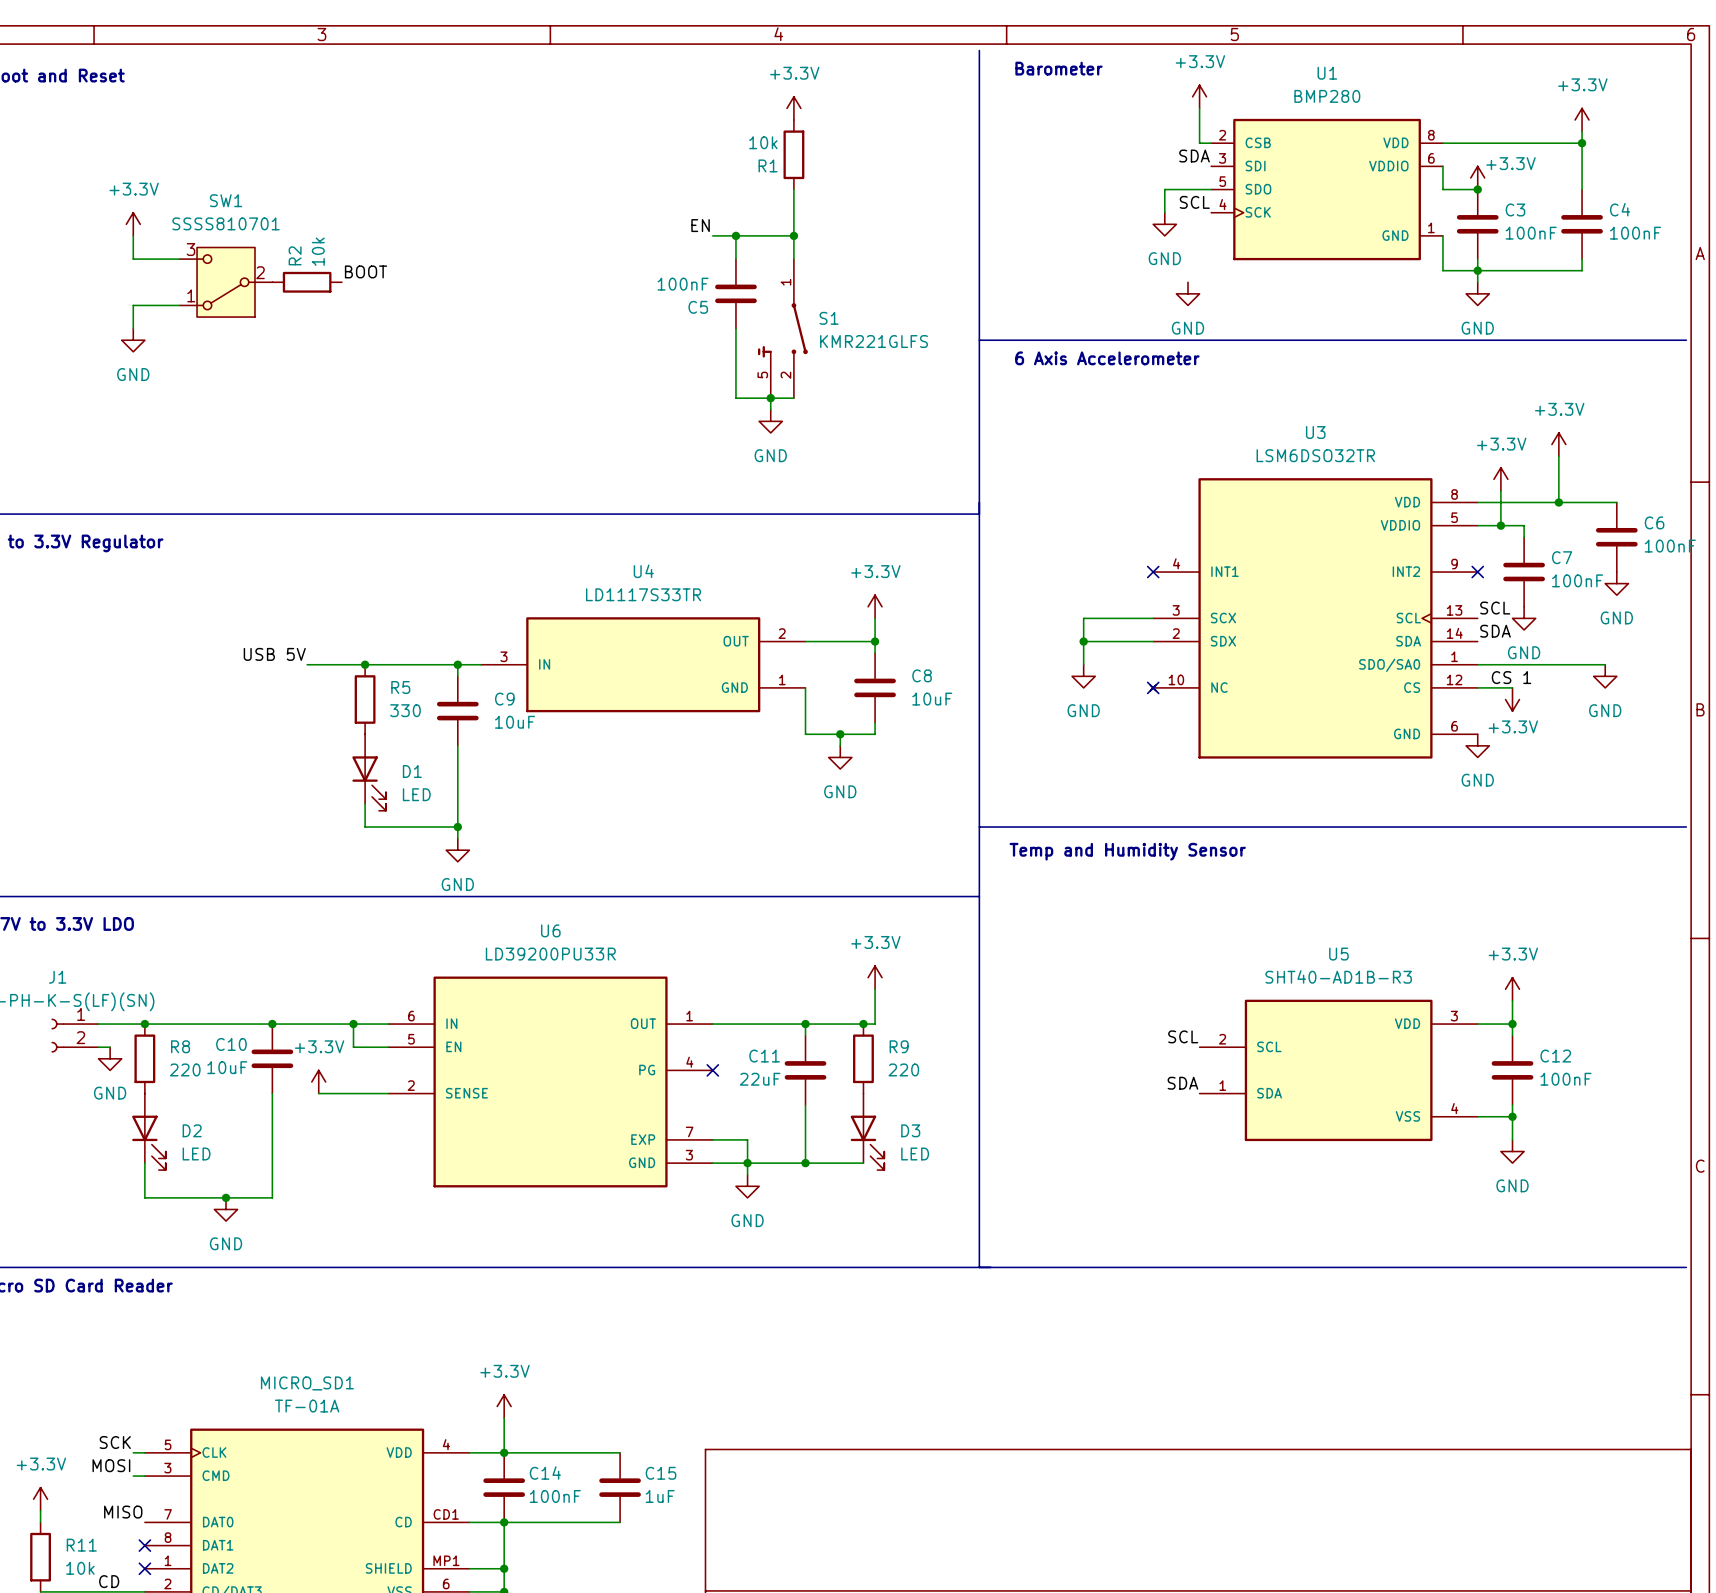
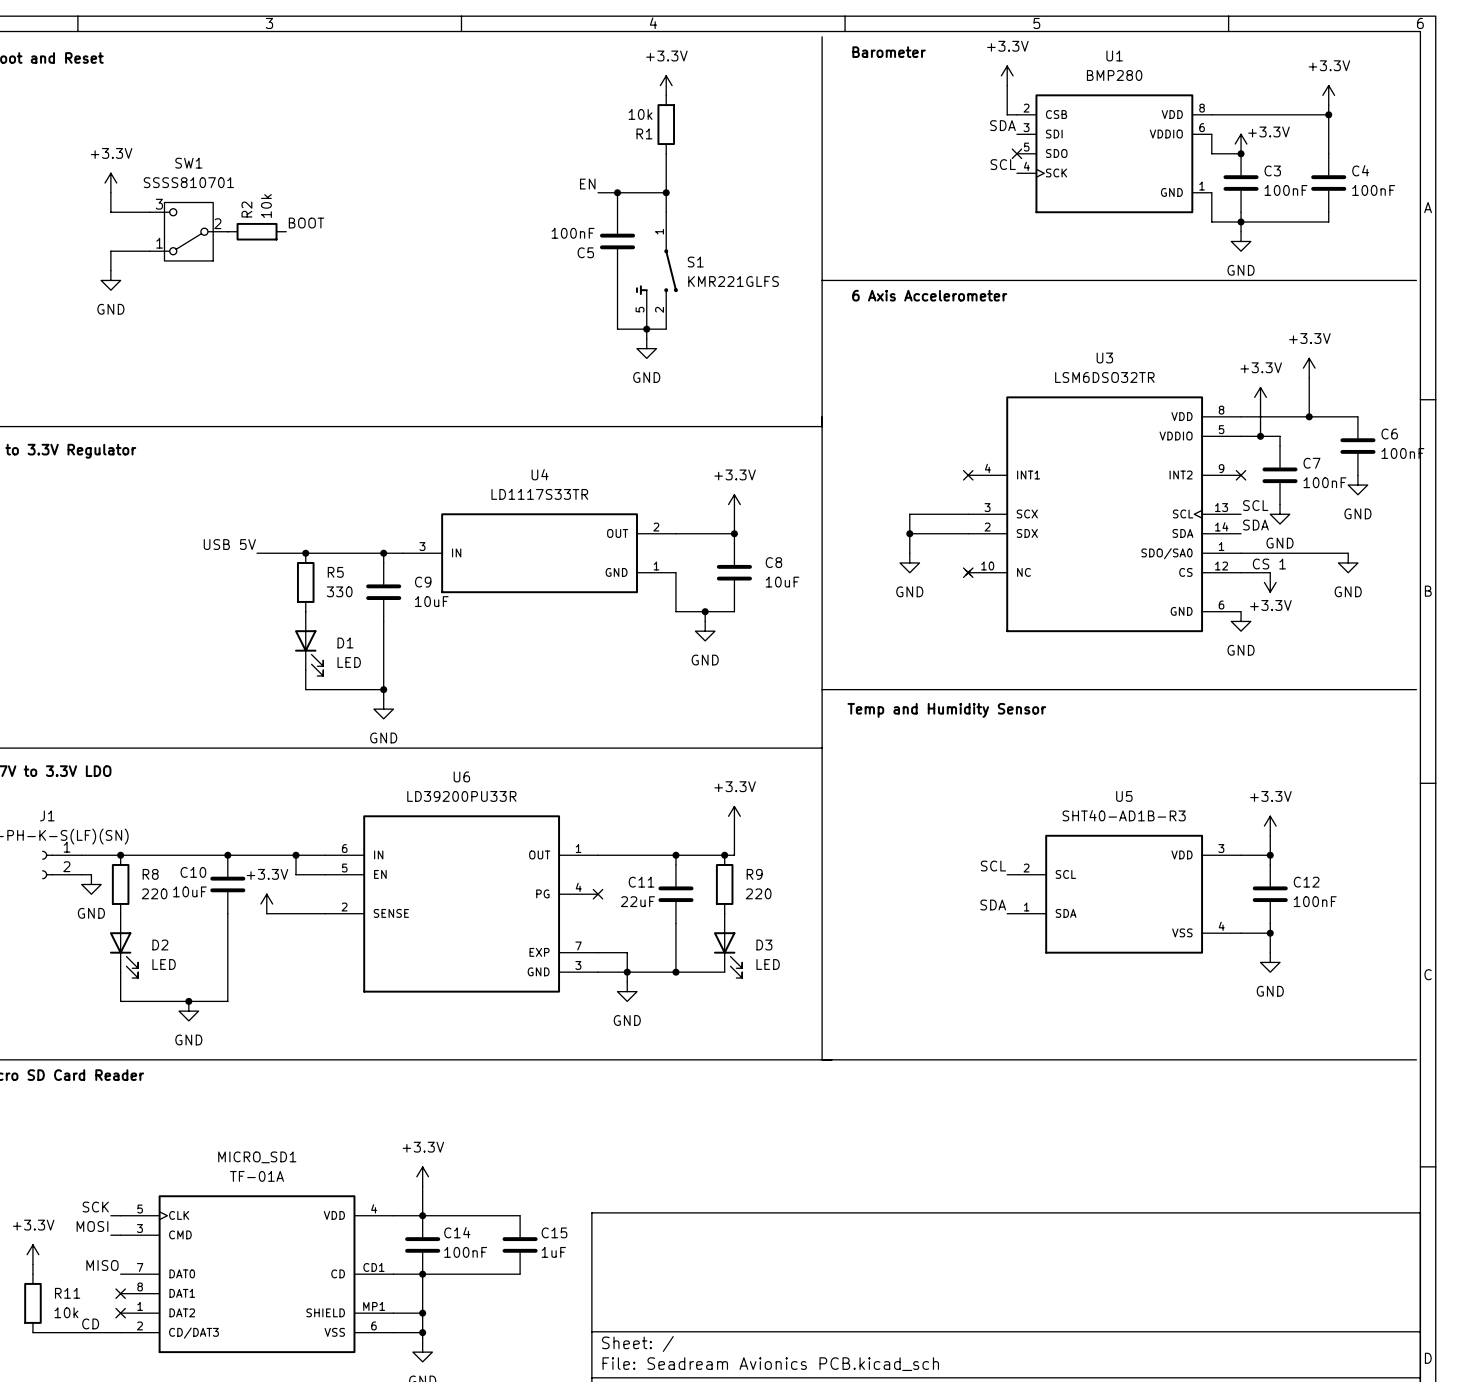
wire: (1211, 189) (1164, 189) (1164, 212) -> none
no-connect mark: none -> (1016, 153)
power symbol: GND (1164, 224) -> none
power symbol: GND (1187, 293) -> none

